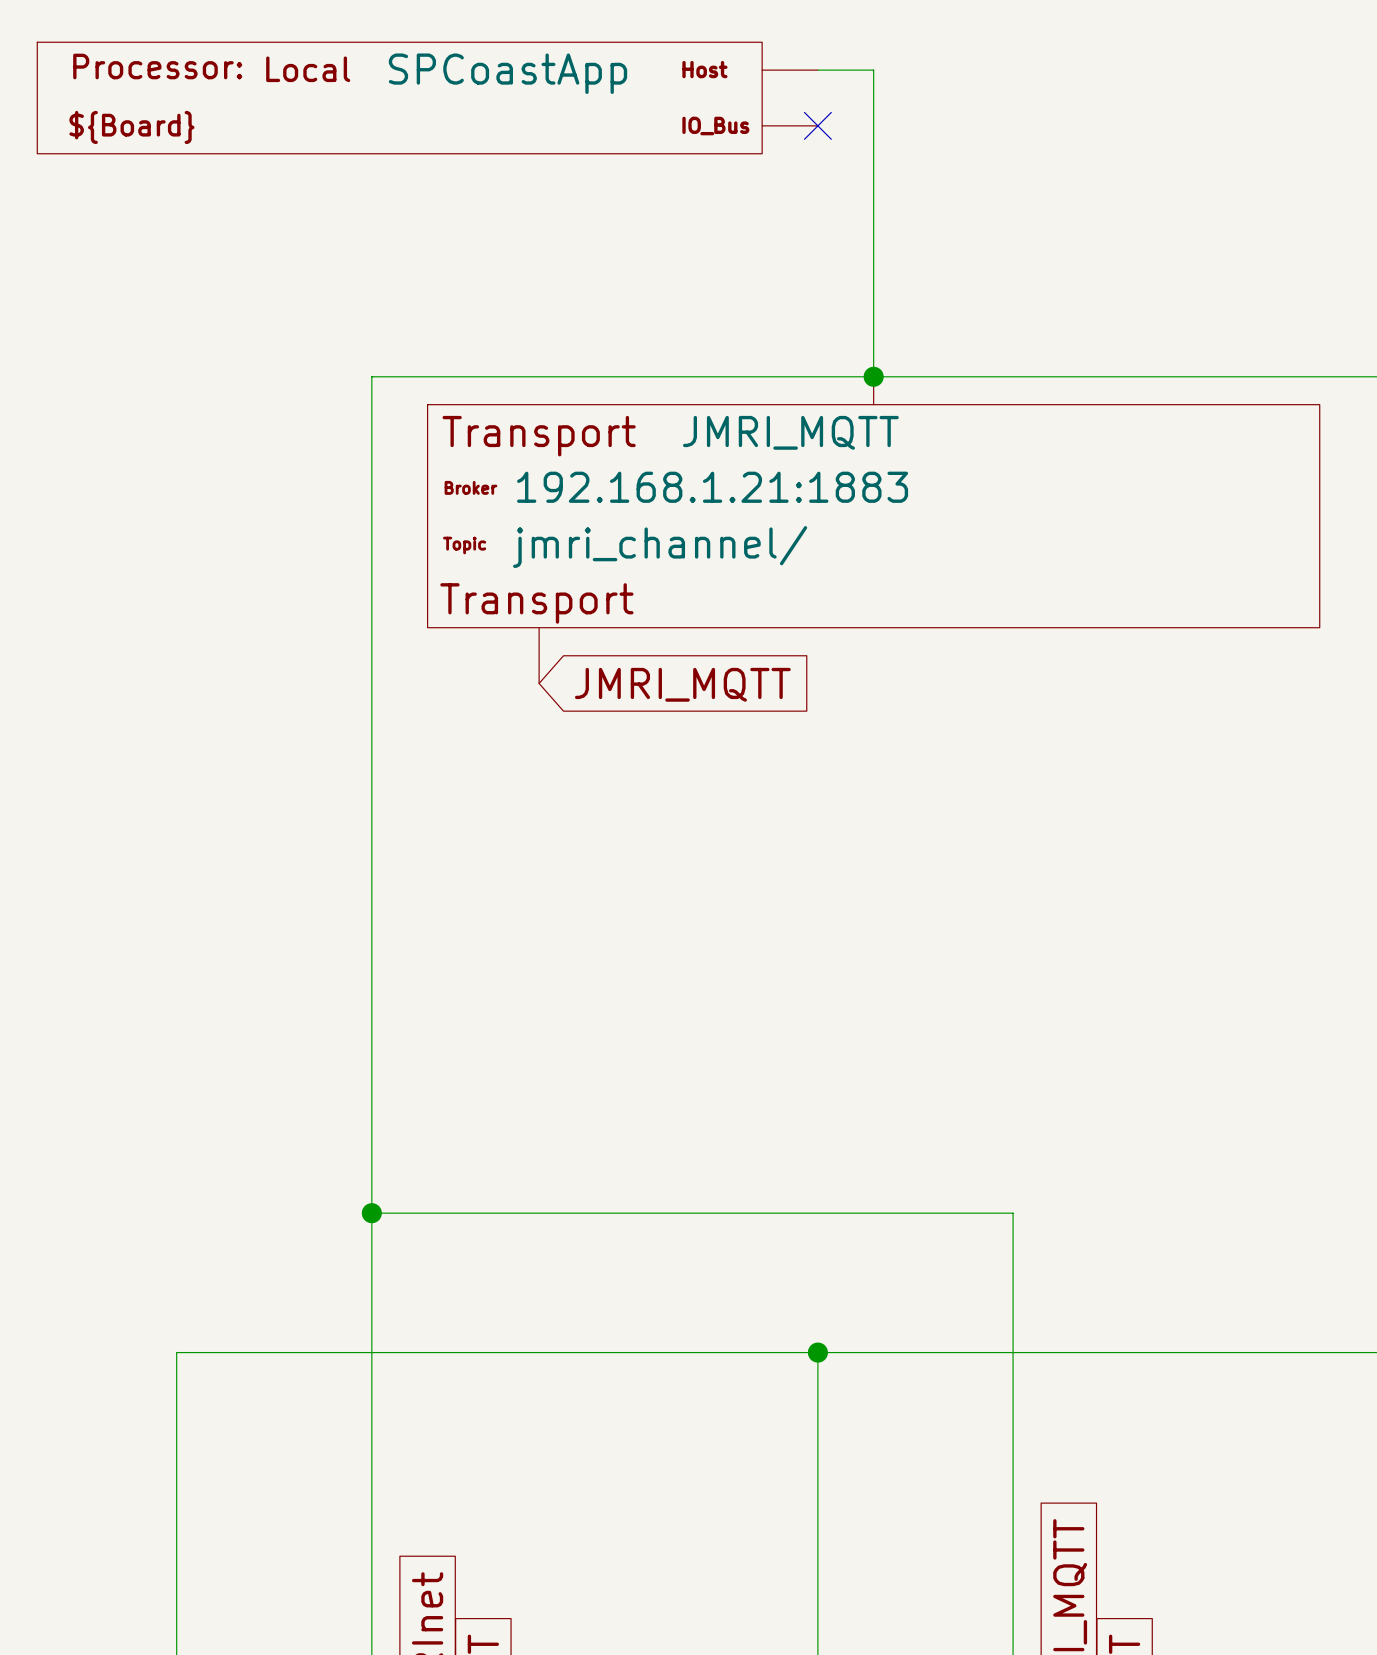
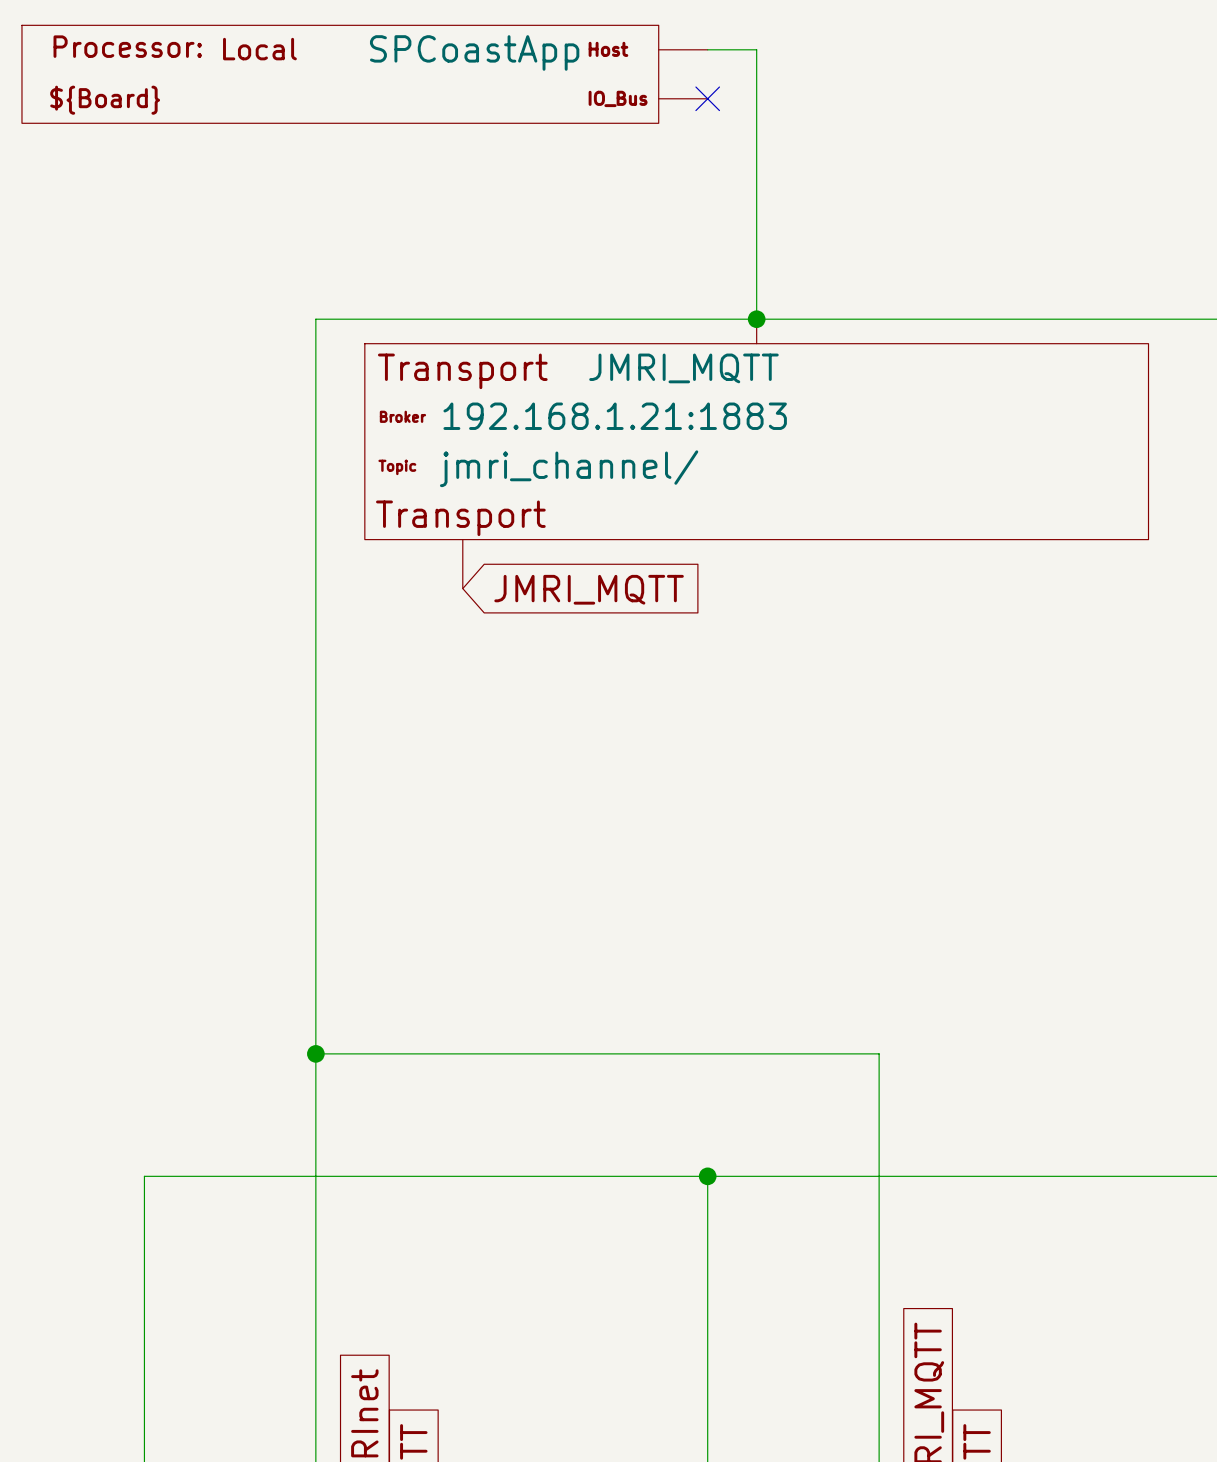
part value position: SPCoastApp (507, 73) -> SPCoastApp (474, 52)

